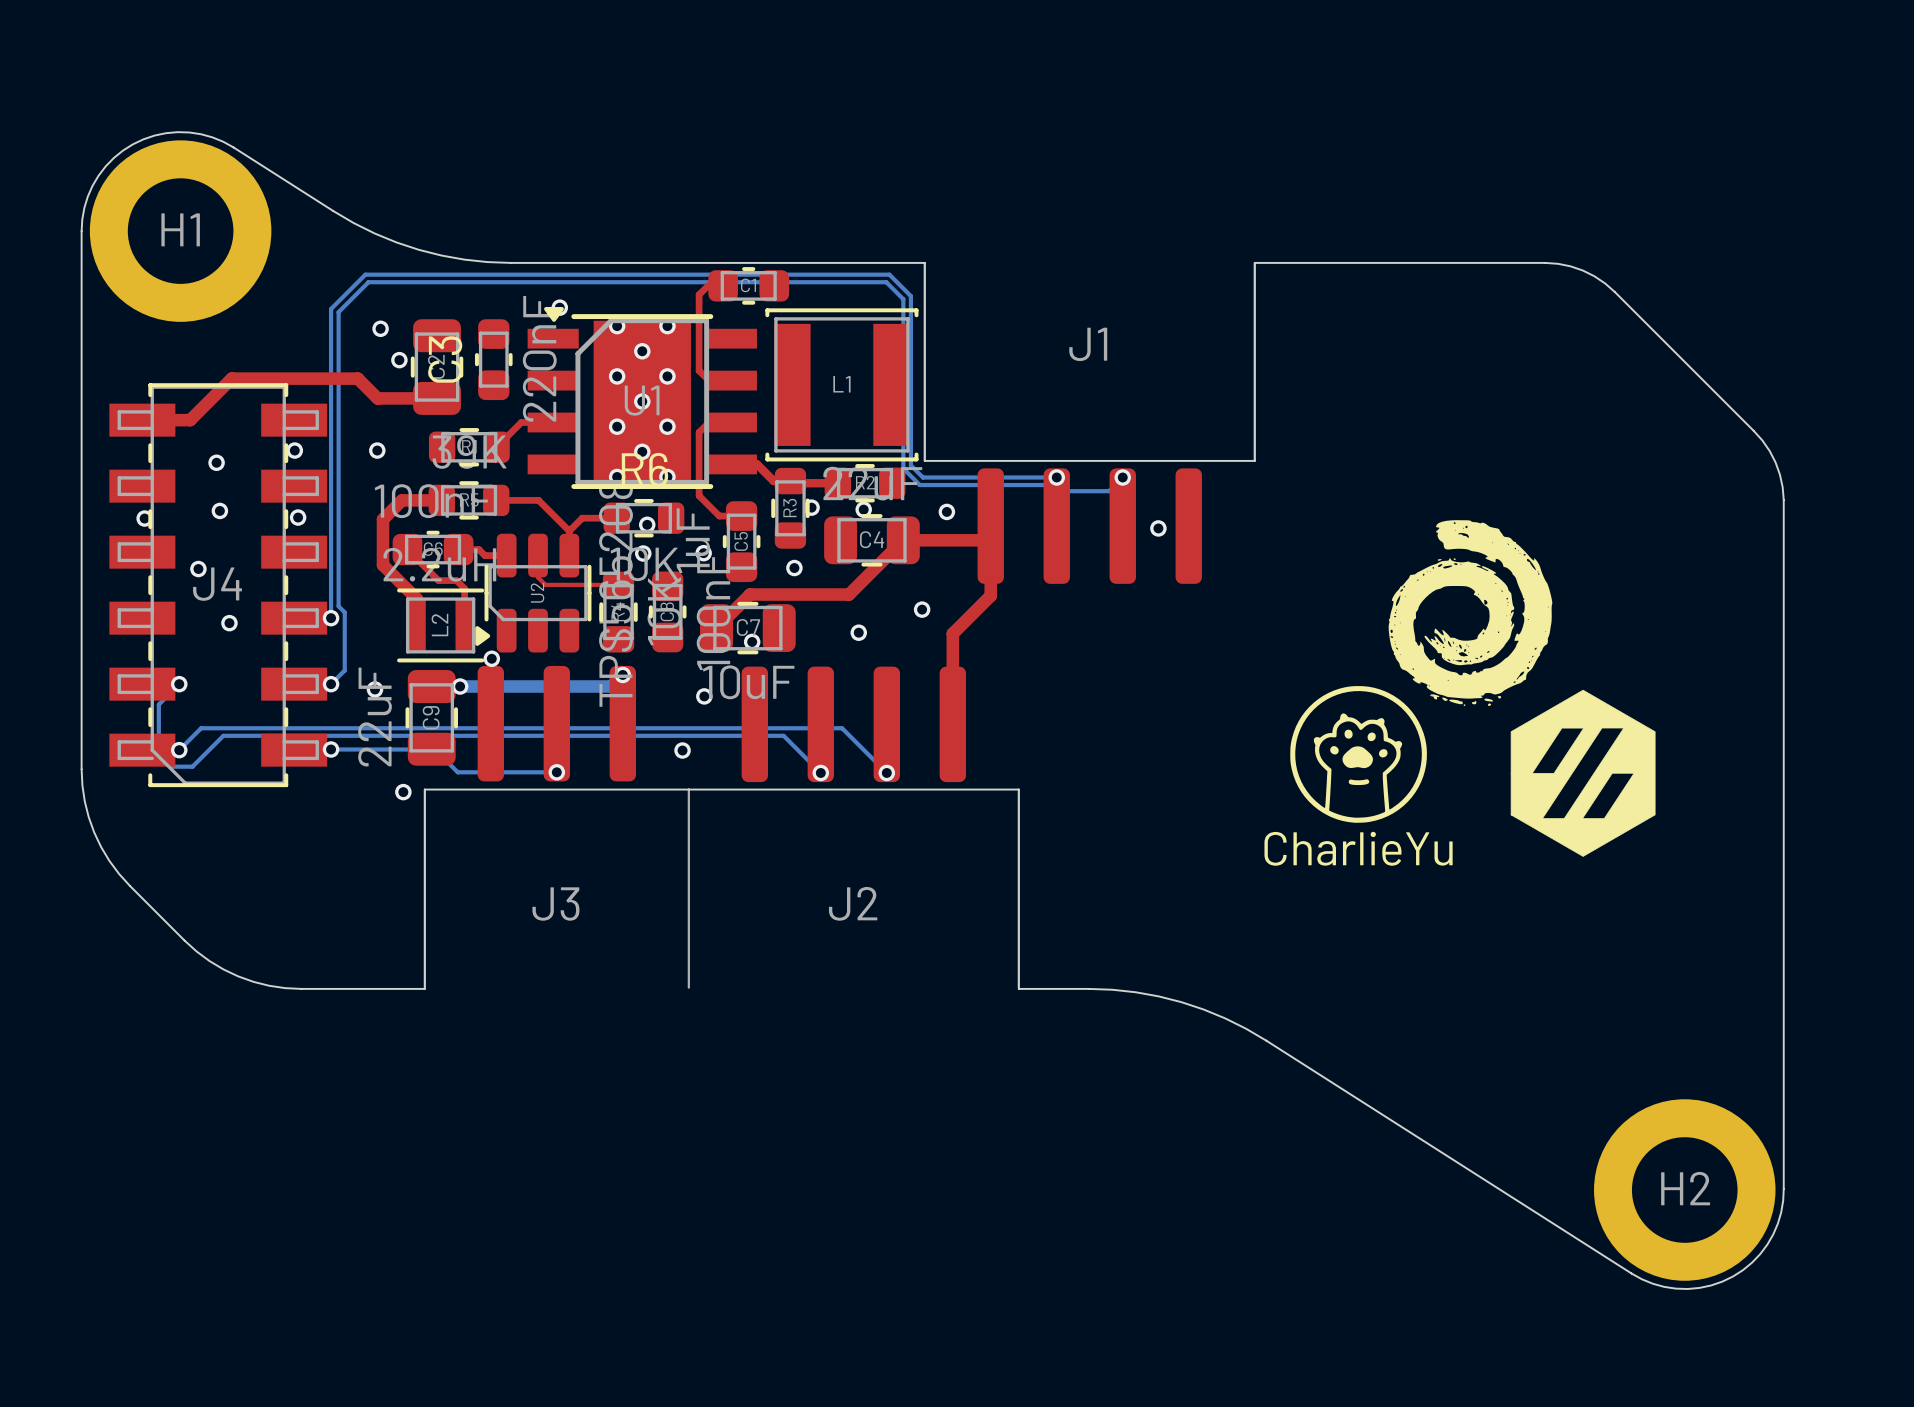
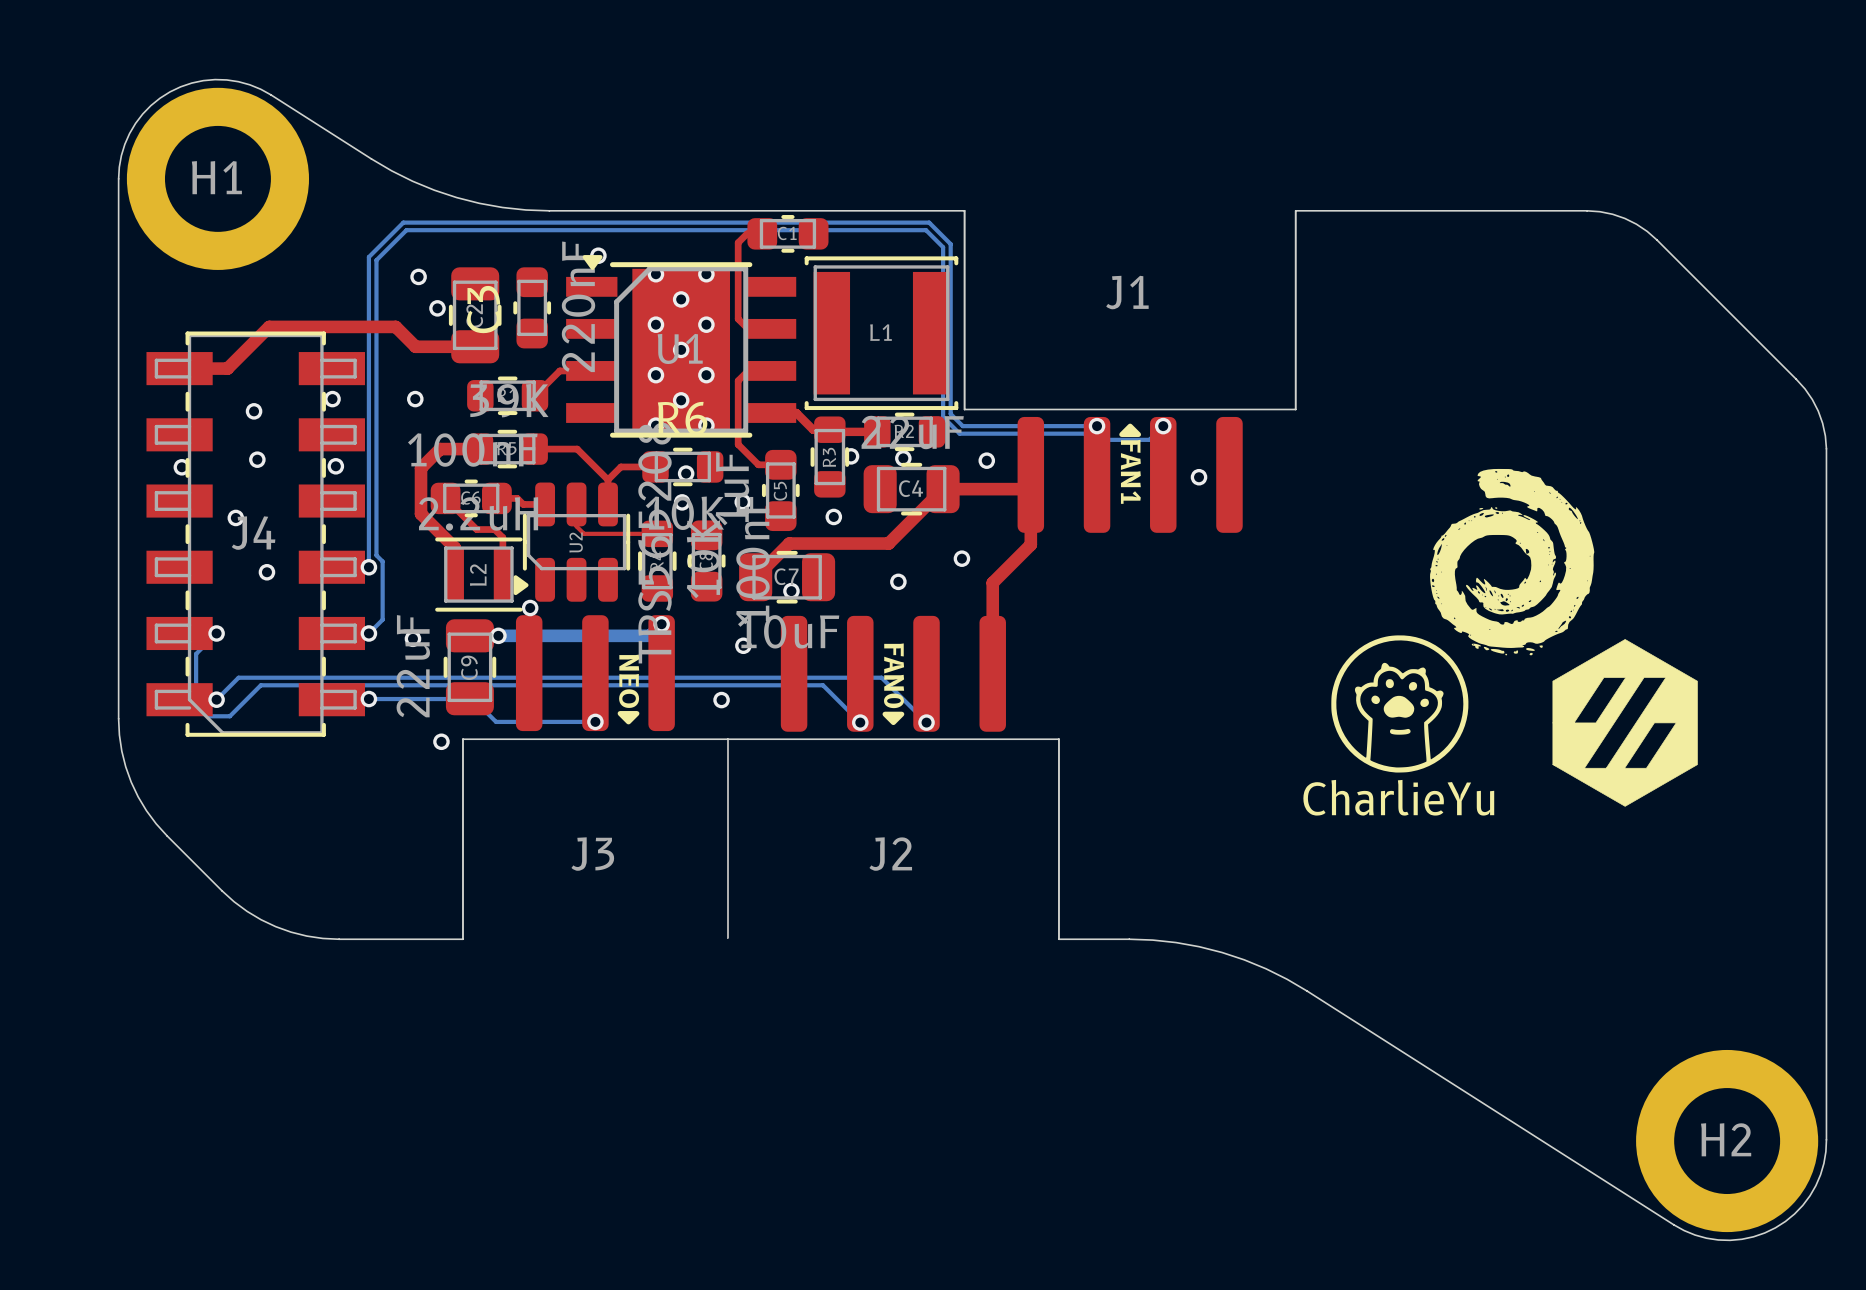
drawing: none -> [1119, 423, 1142, 438]
text: none -> FAN1 (1130, 471)
text: none -> FAN0 (894, 675)
text: none -> NEO (629, 681)
drawing: none -> [617, 711, 640, 725]
drawing: none -> [882, 711, 905, 726]

